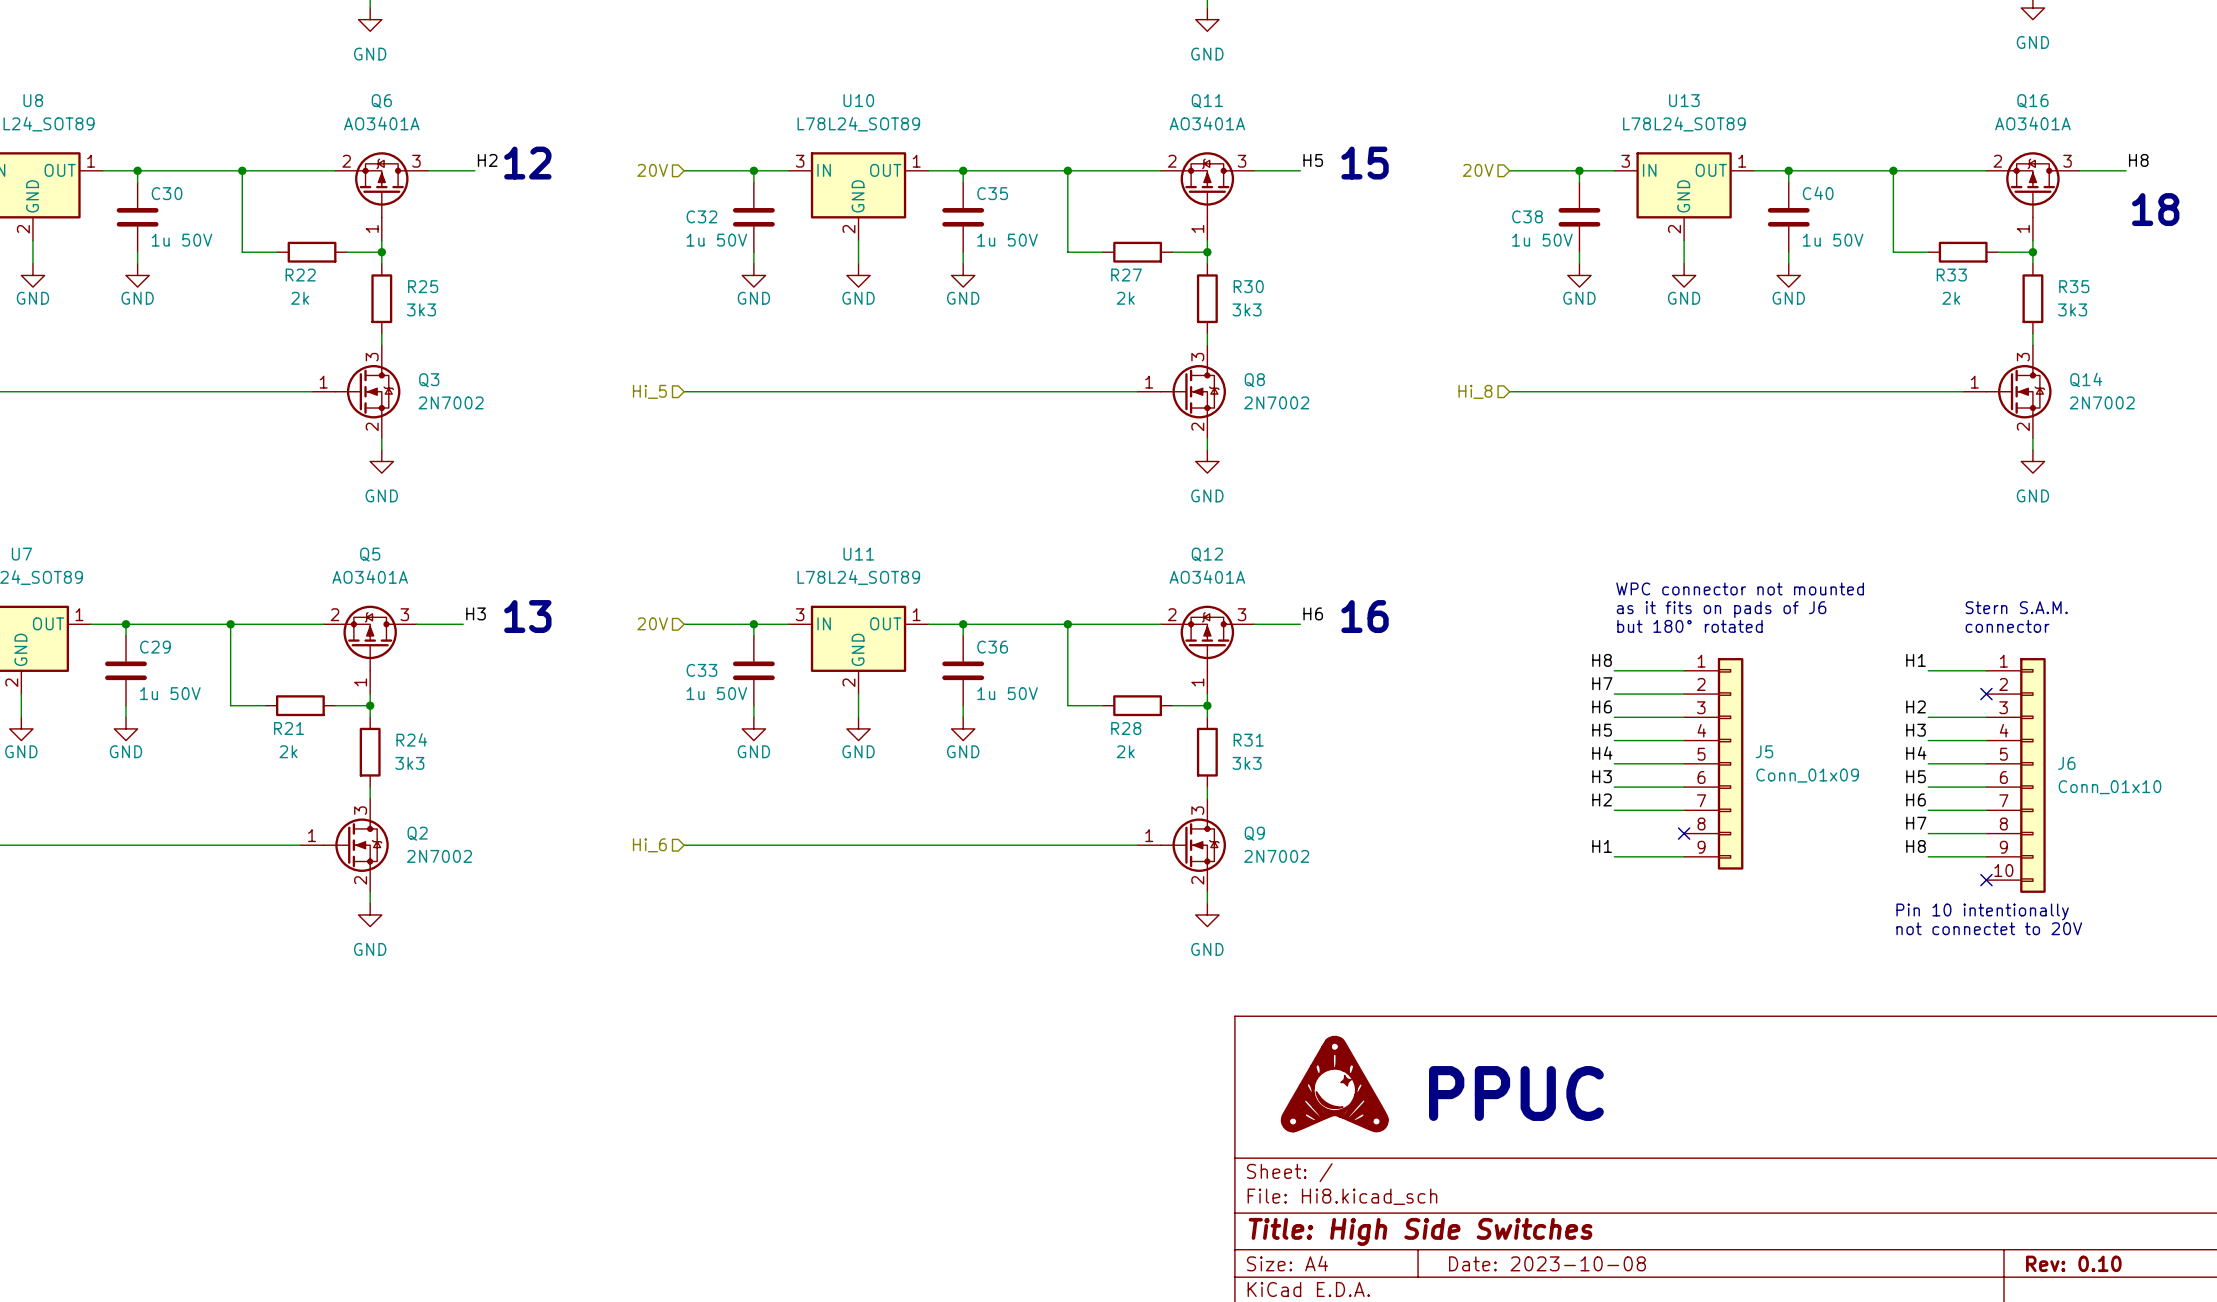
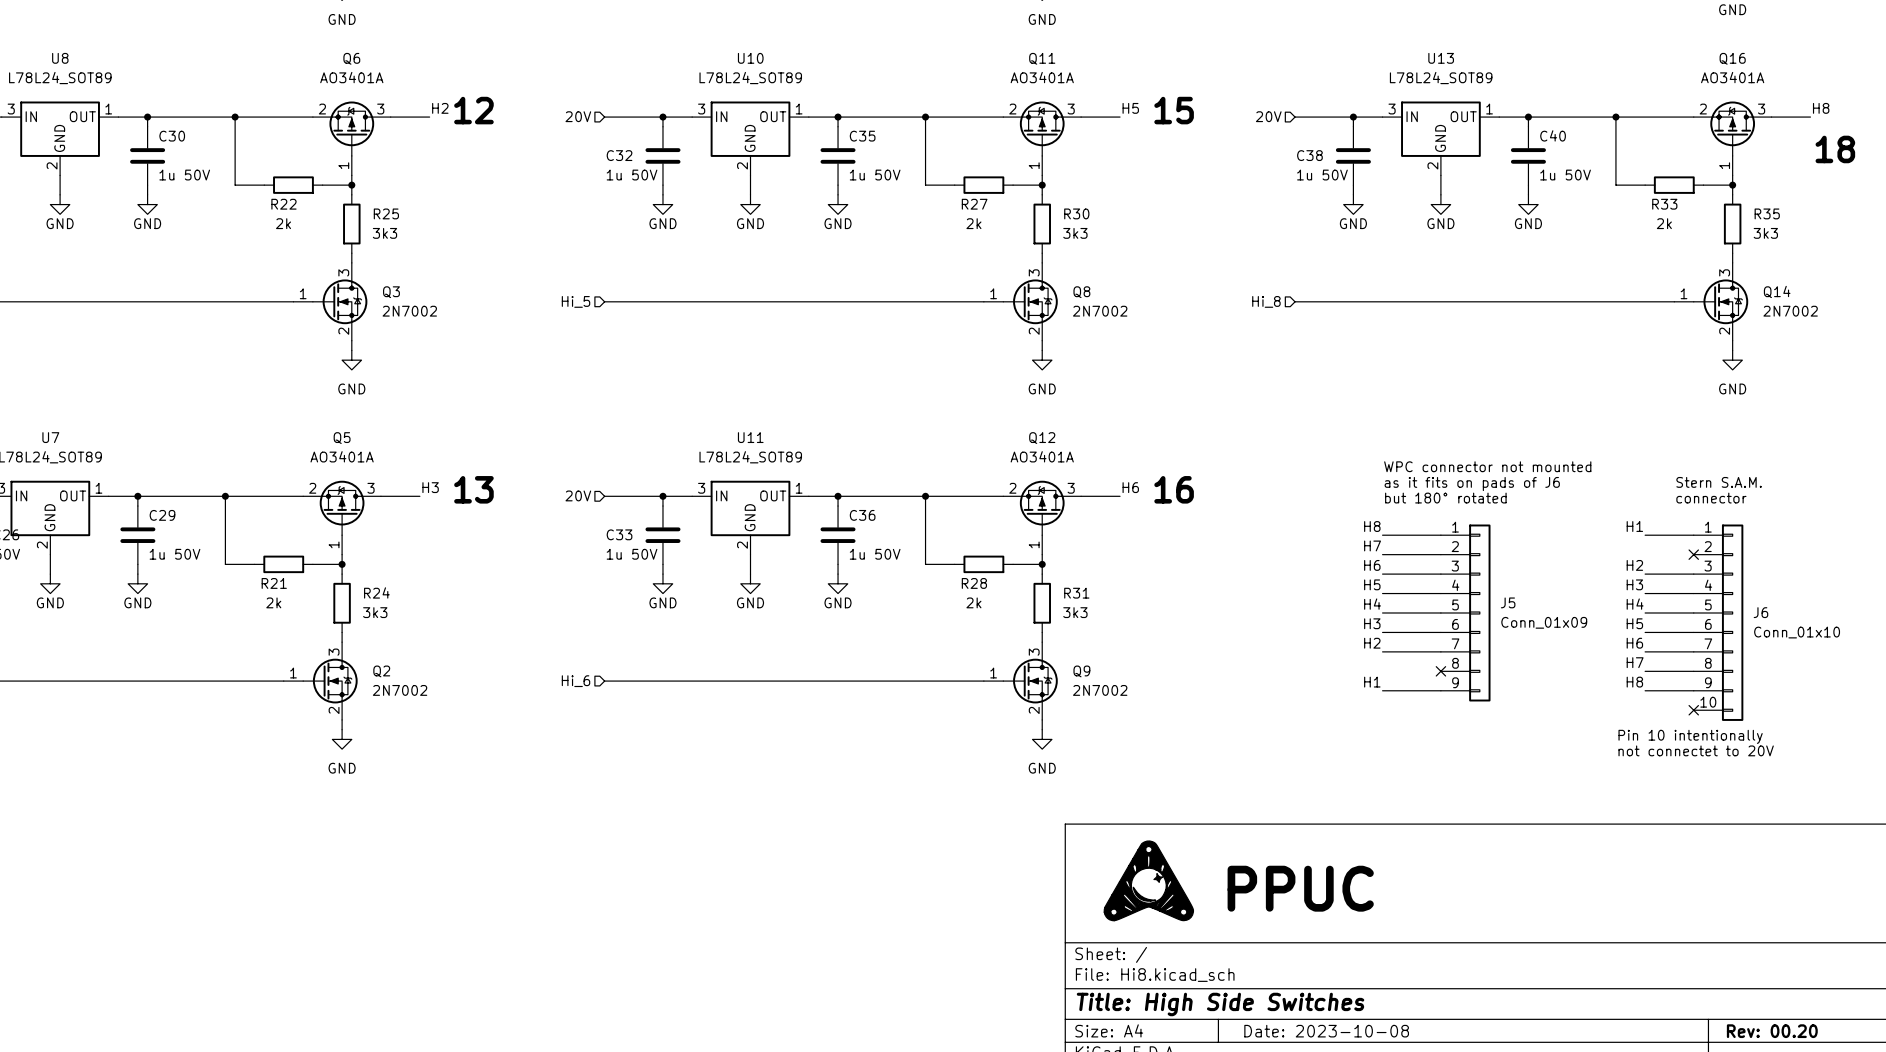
title block: Rev: 0.10 (2073, 1263) -> Rev: 00.20 (1772, 1031)

